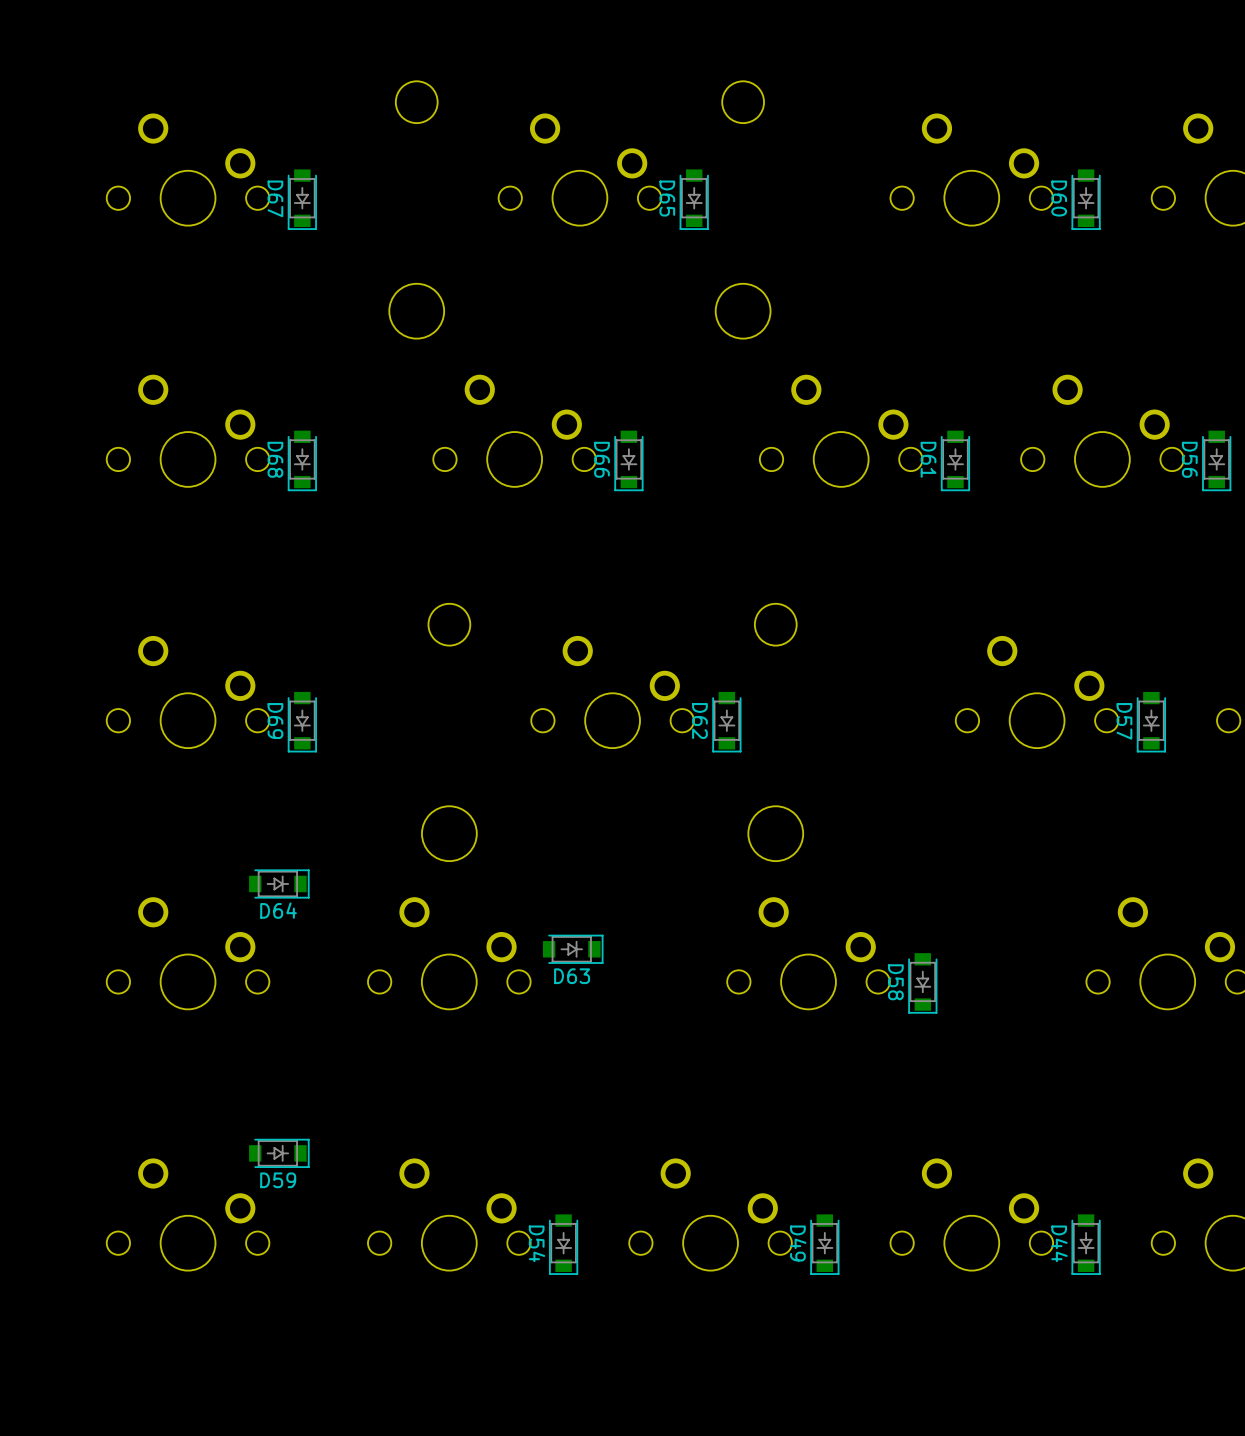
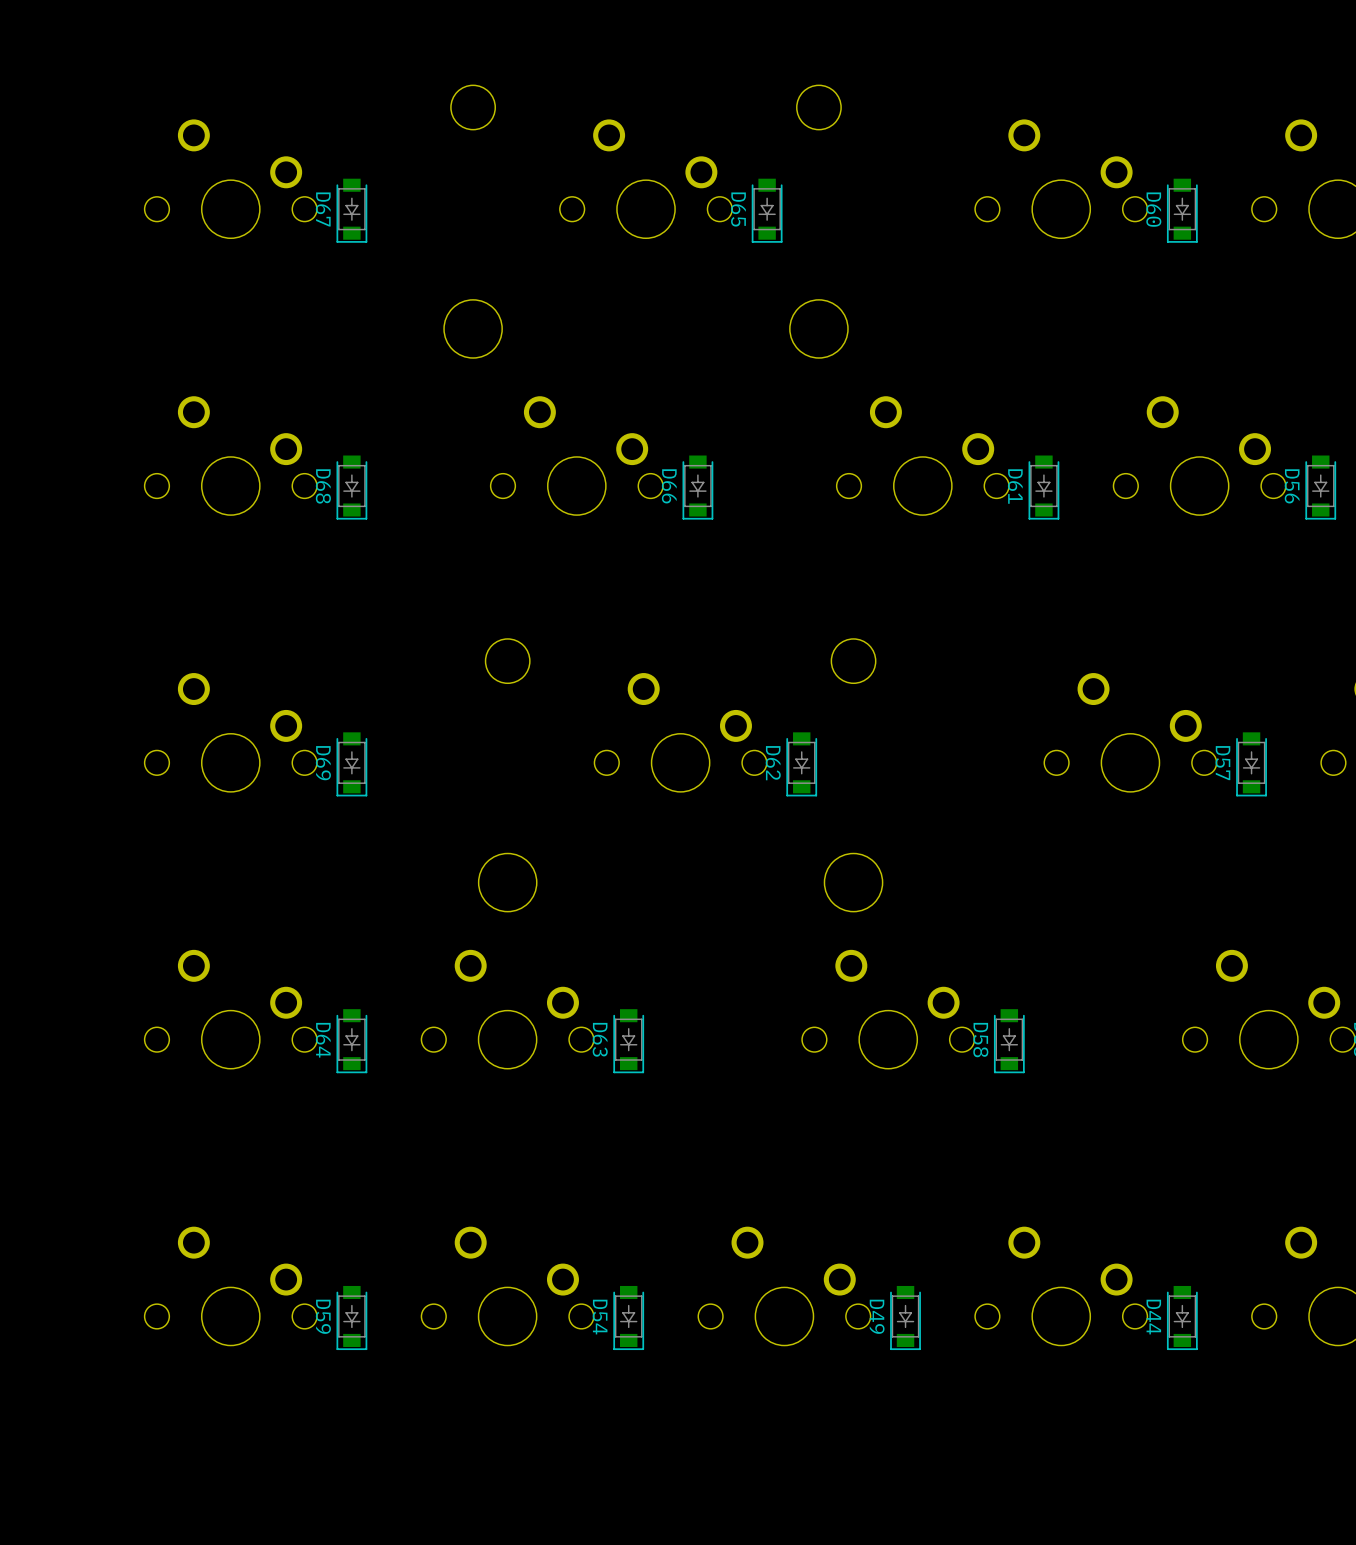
D64 rotation: 0° (279, 883) -> 90° clockwise (351, 1041)
D64 position: (279, 883) -> (351, 1041)
D63 rotation: 0° (573, 949) -> 90° clockwise (628, 1041)
D59 rotation: 0° (279, 1153) -> 90° clockwise (351, 1318)
D59 position: (279, 1153) -> (351, 1318)

